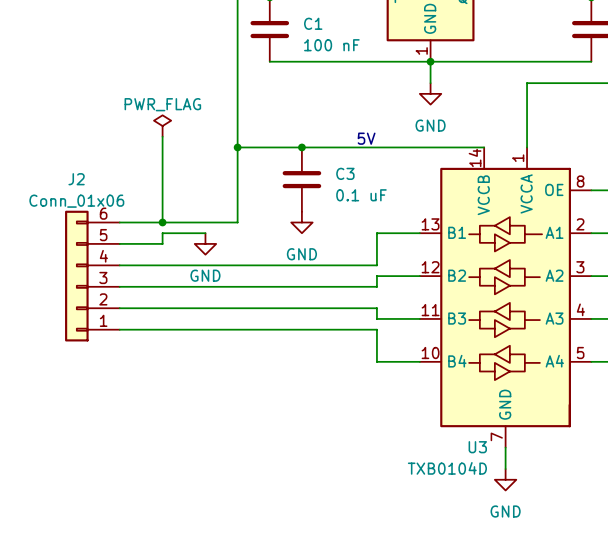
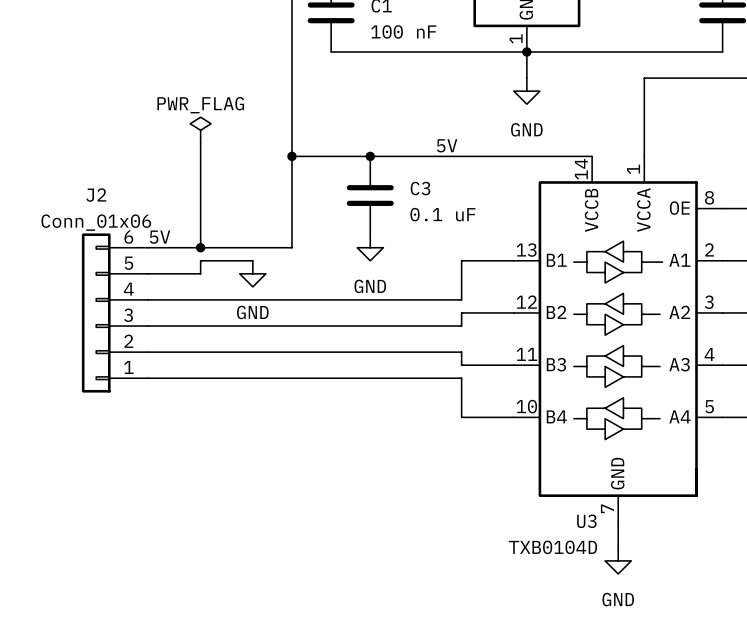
text: none -> 5V (160, 237)

